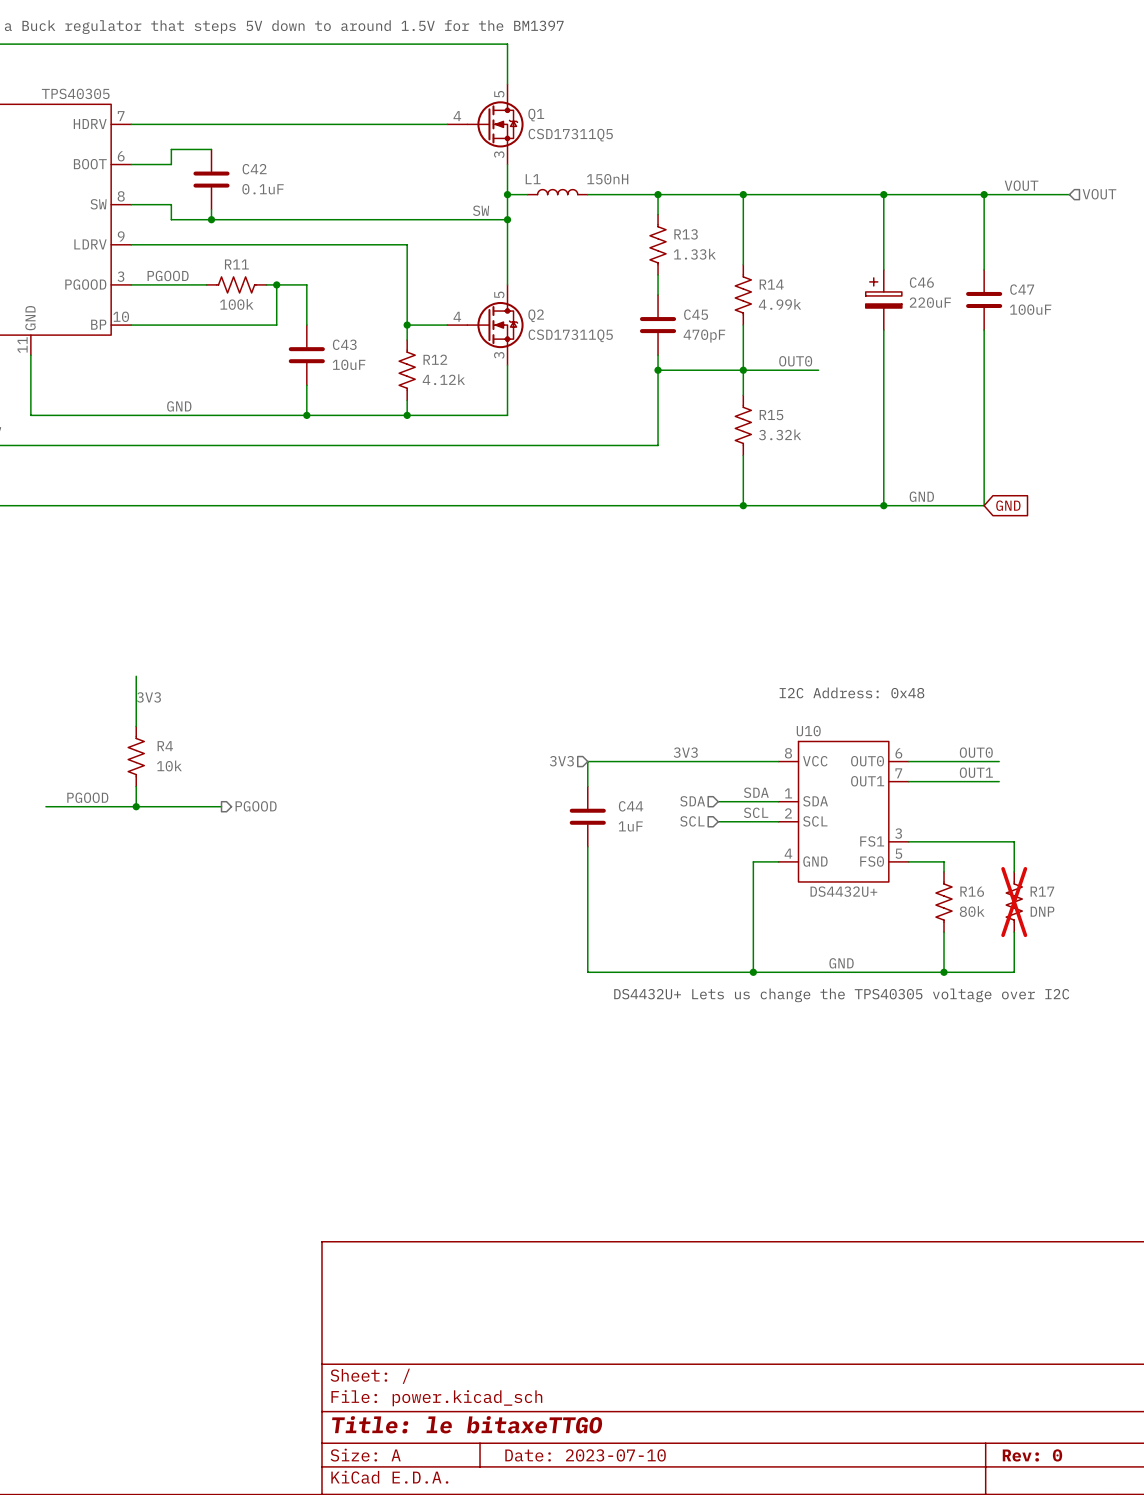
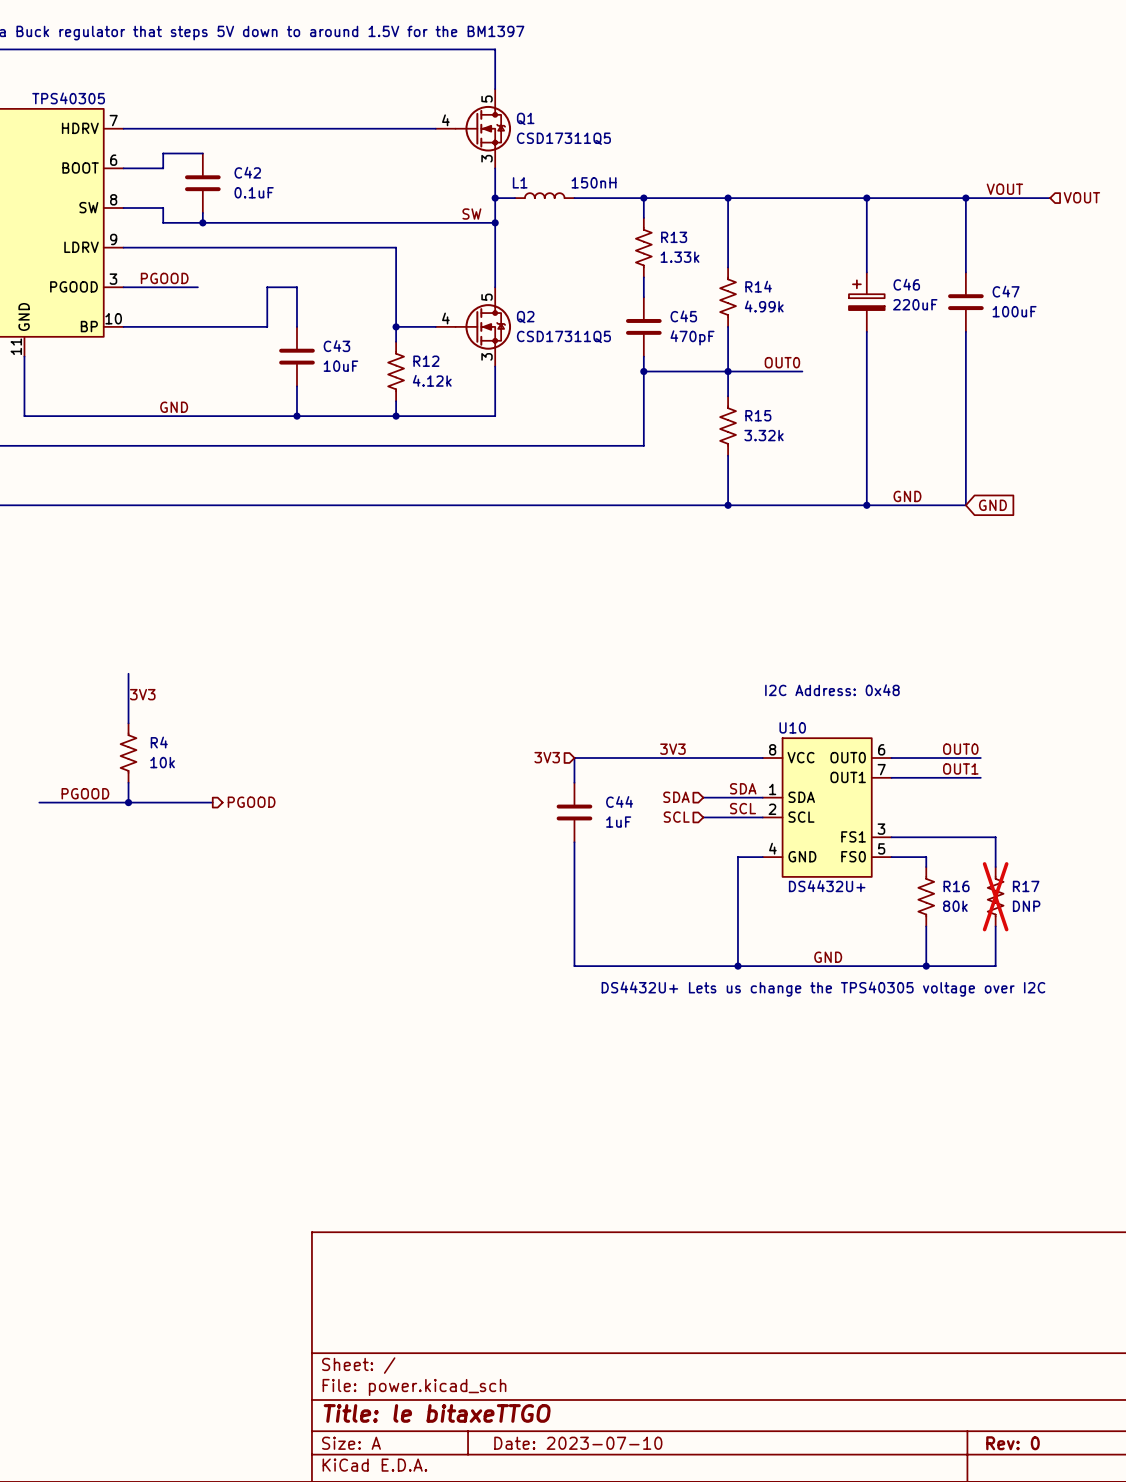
R11: 100k (236, 284) -> none
wire: (266, 284) (276, 284) -> none
junction: (276, 284) -> none

